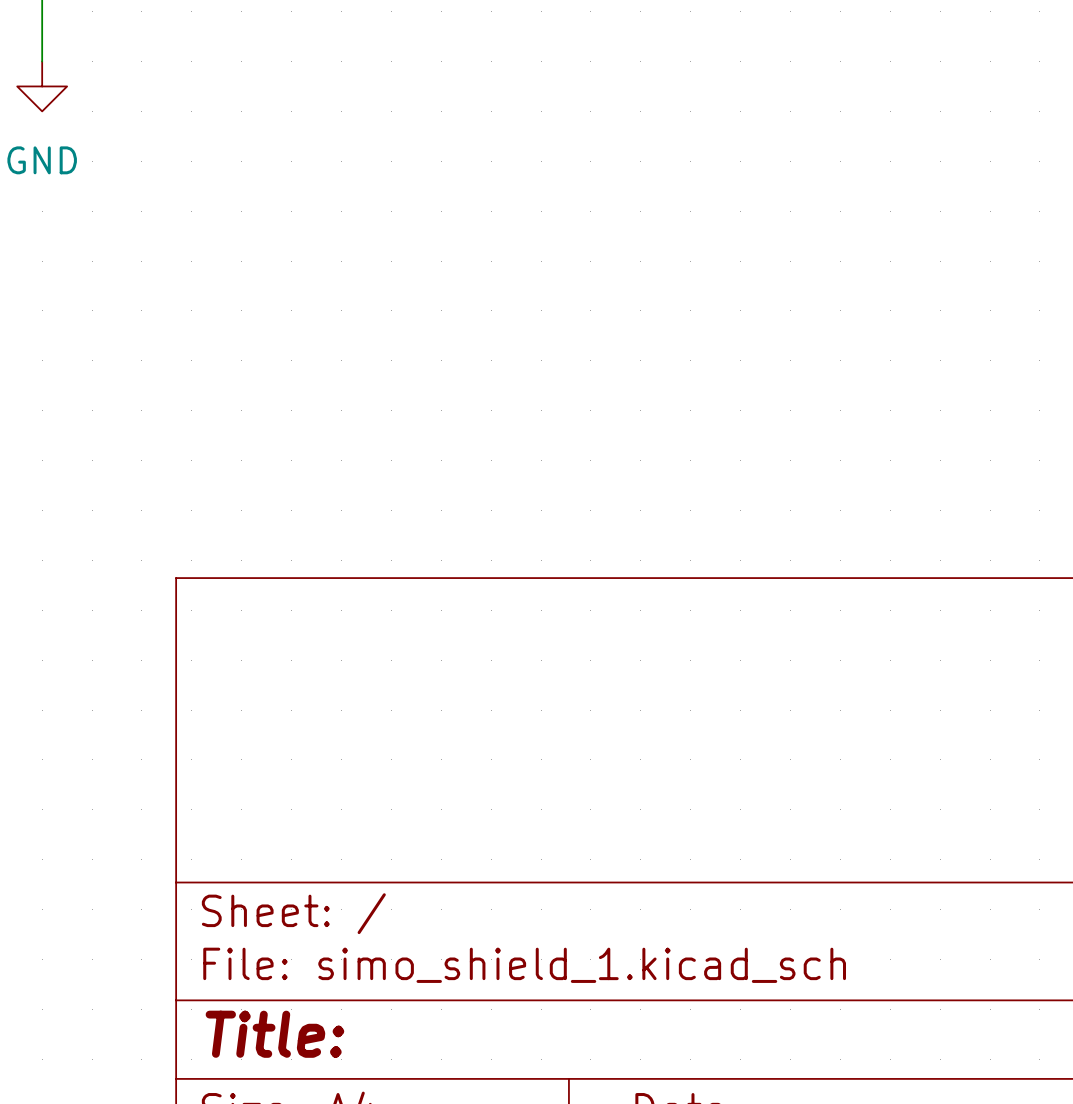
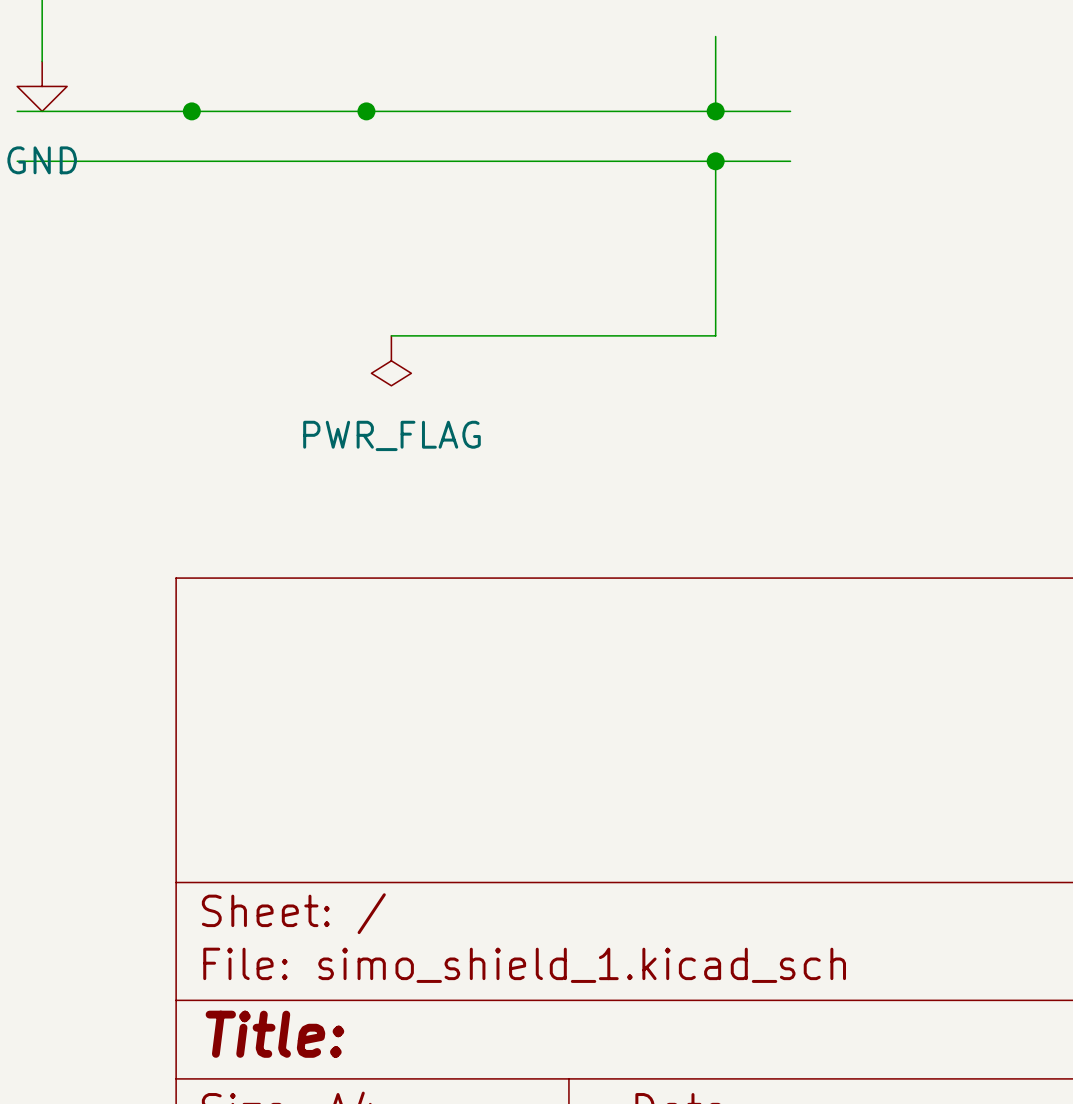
wire: none -> (715, 36) (715, 111)
wire: none -> (17, 111) (790, 111)
junction: none -> (191, 111)
junction: none -> (366, 111)
junction: none -> (715, 111)
wire: none -> (17, 161) (790, 161)
wire: none -> (715, 161) (715, 335) (391, 335)
junction: none -> (715, 161)
power symbol: none -> PWR_FLAG (391, 360)

